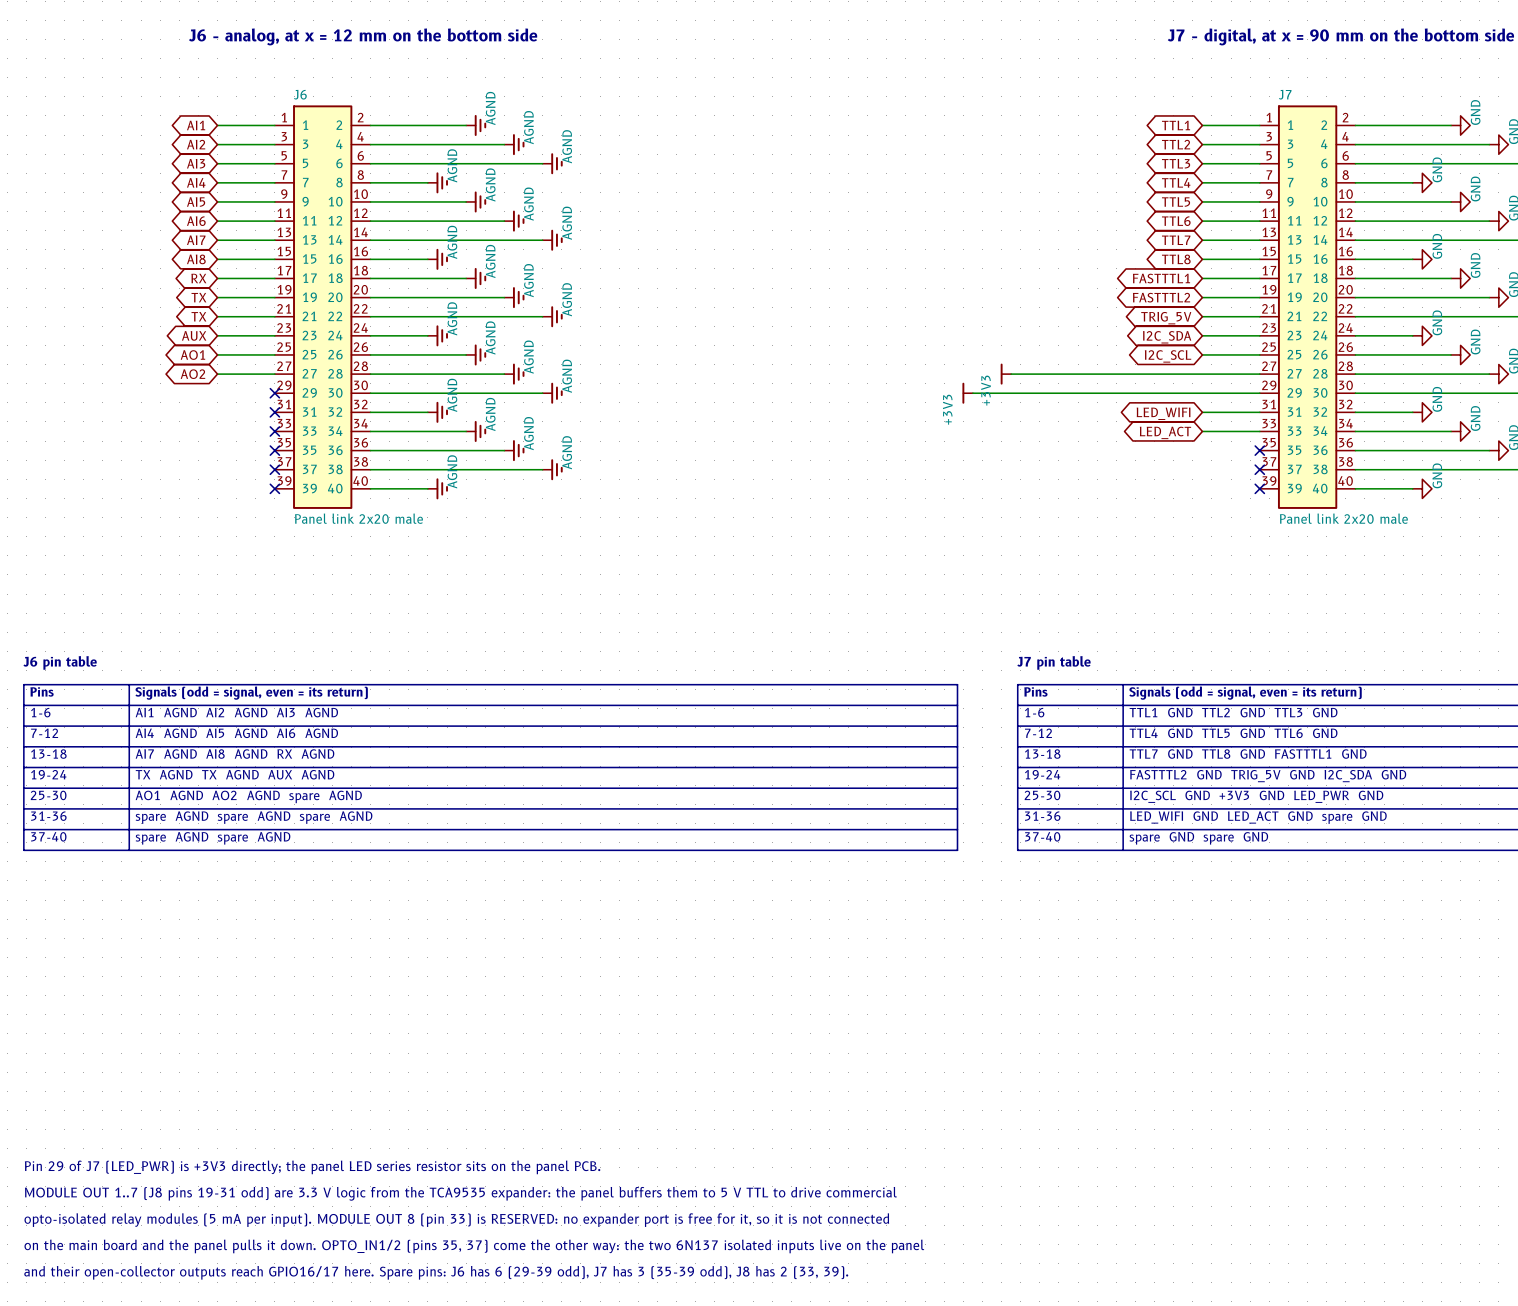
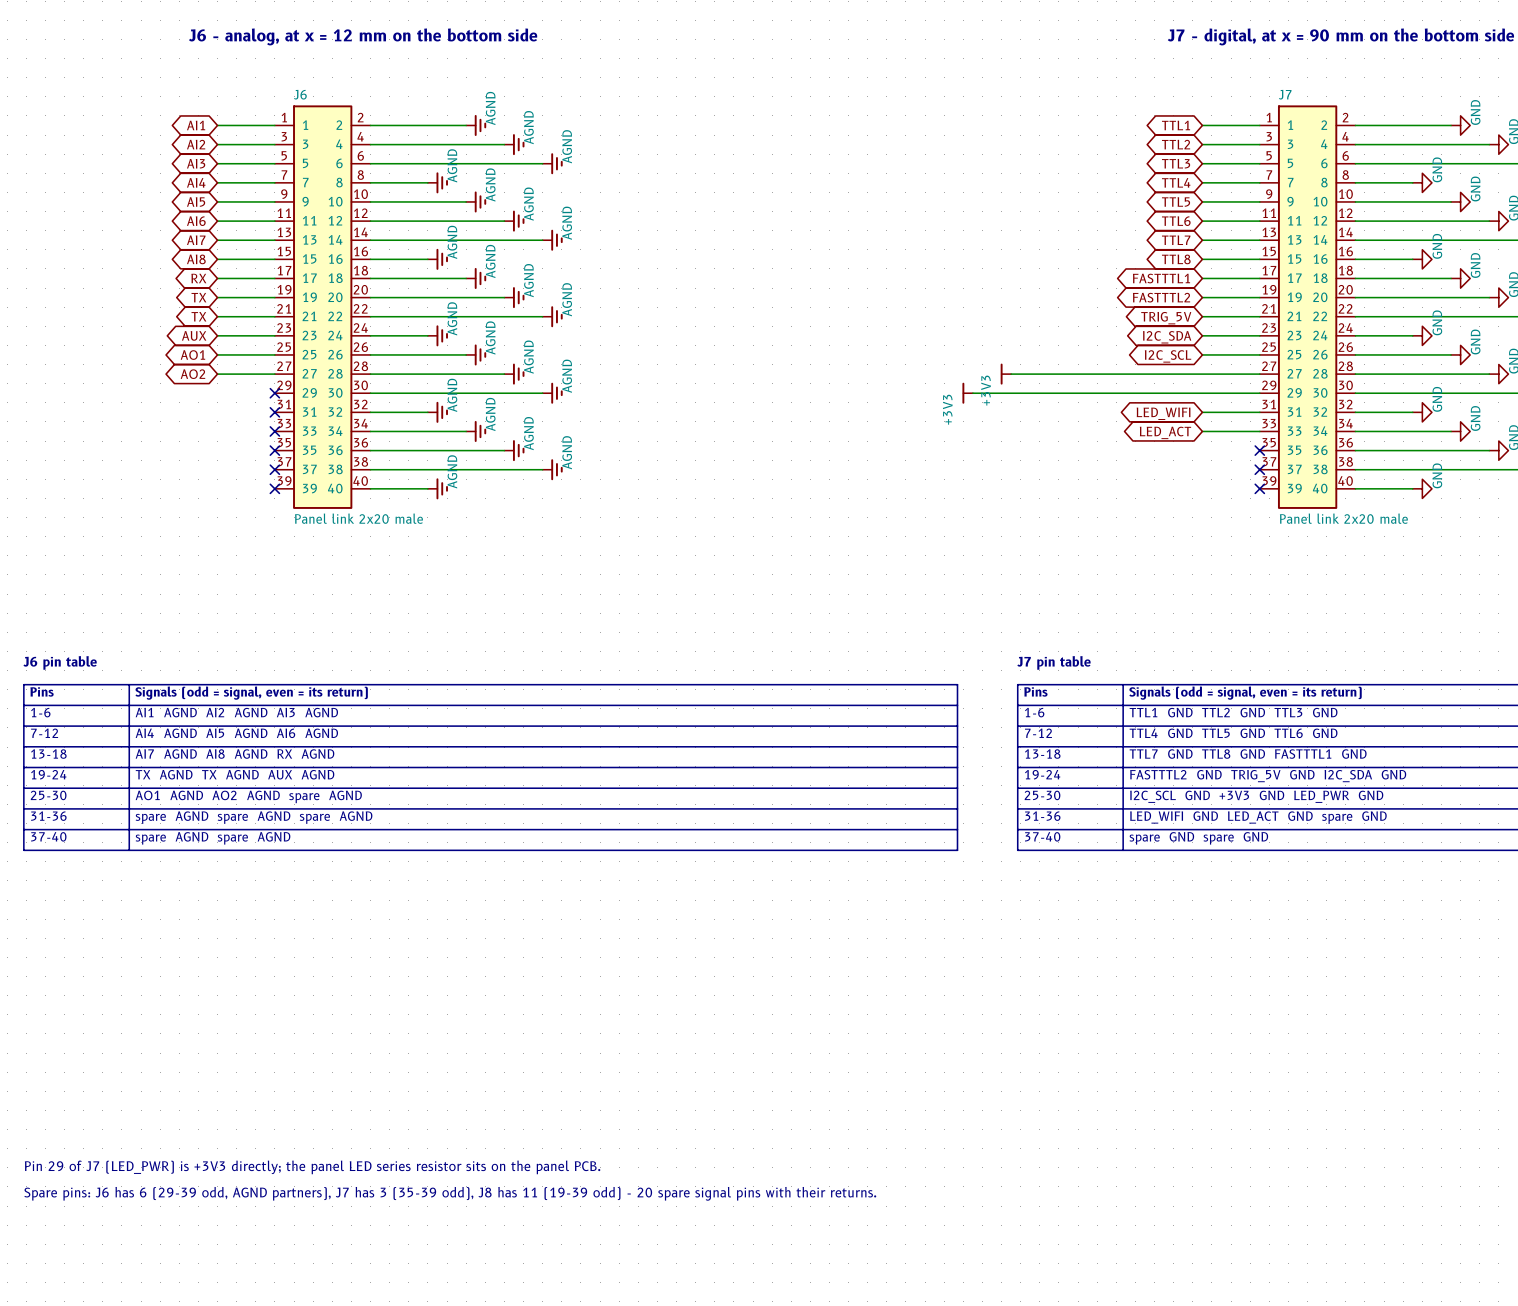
text: MODULE OUT 1..7 (J8 pins 19-31 odd) are 3.3 V logic from the TCA9535 expander: the panel buffers them to 5 V TTL to drive commercial (460, 1193) -> Spare pins: J6 has 6 (29-39 odd, AGND partners), J7 has 3 (35-39 odd), J8 has 11 (19-39 odd) - 20 spare signal pins with their returns. (450, 1193)
text: opto-isolated relay modules (5 mA per input). MODULE OUT 8 (pin 33) is RESERVED: no expander port is free for it, so it is not connected (456, 1220) -> none
text: on the main board and the panel pulls it down. OPTO_IN1/2 (pins 35, 37) come the other way: the two 6N137 isolated inputs live on the panel (474, 1246) -> none
text: and their open-collector outputs reach GPIO16/17 here. Spare pins: J6 has 6 (29-39 odd), J7 has 3 (35-39 odd), J8 has 2 (33, 39). (436, 1272) -> none

